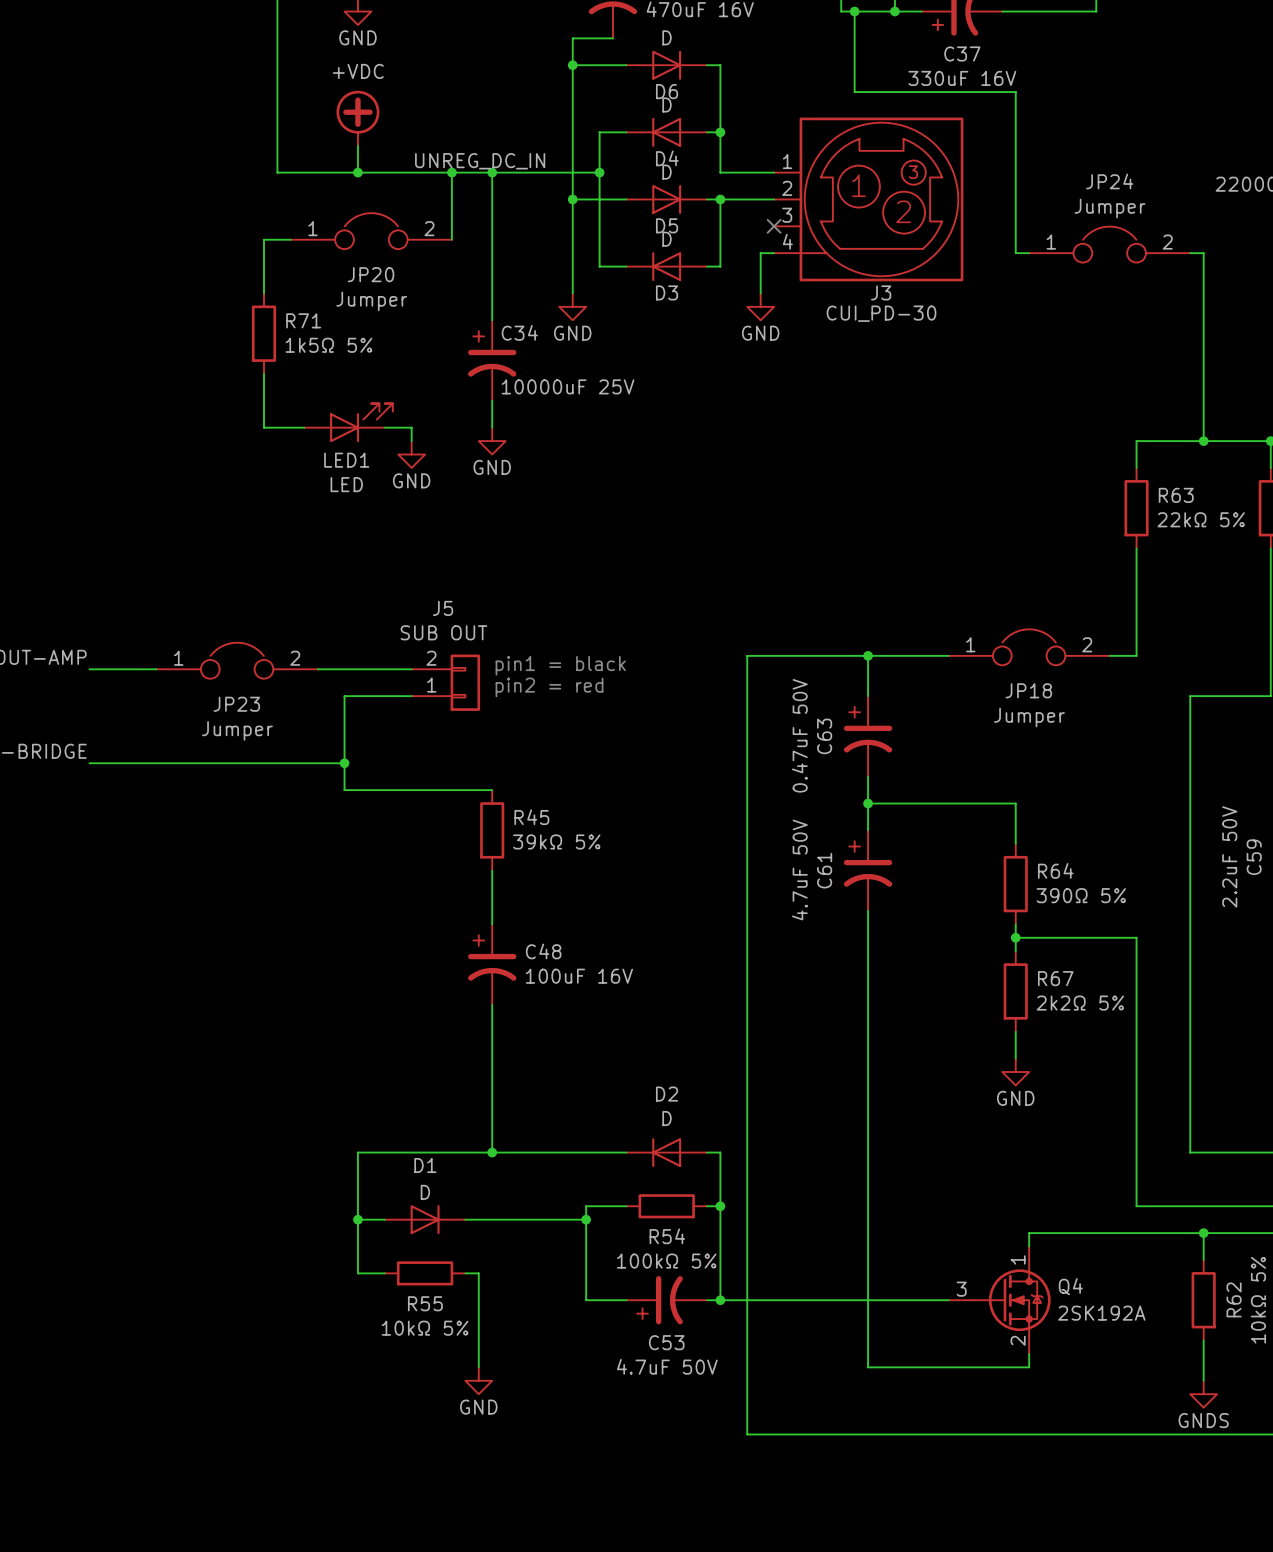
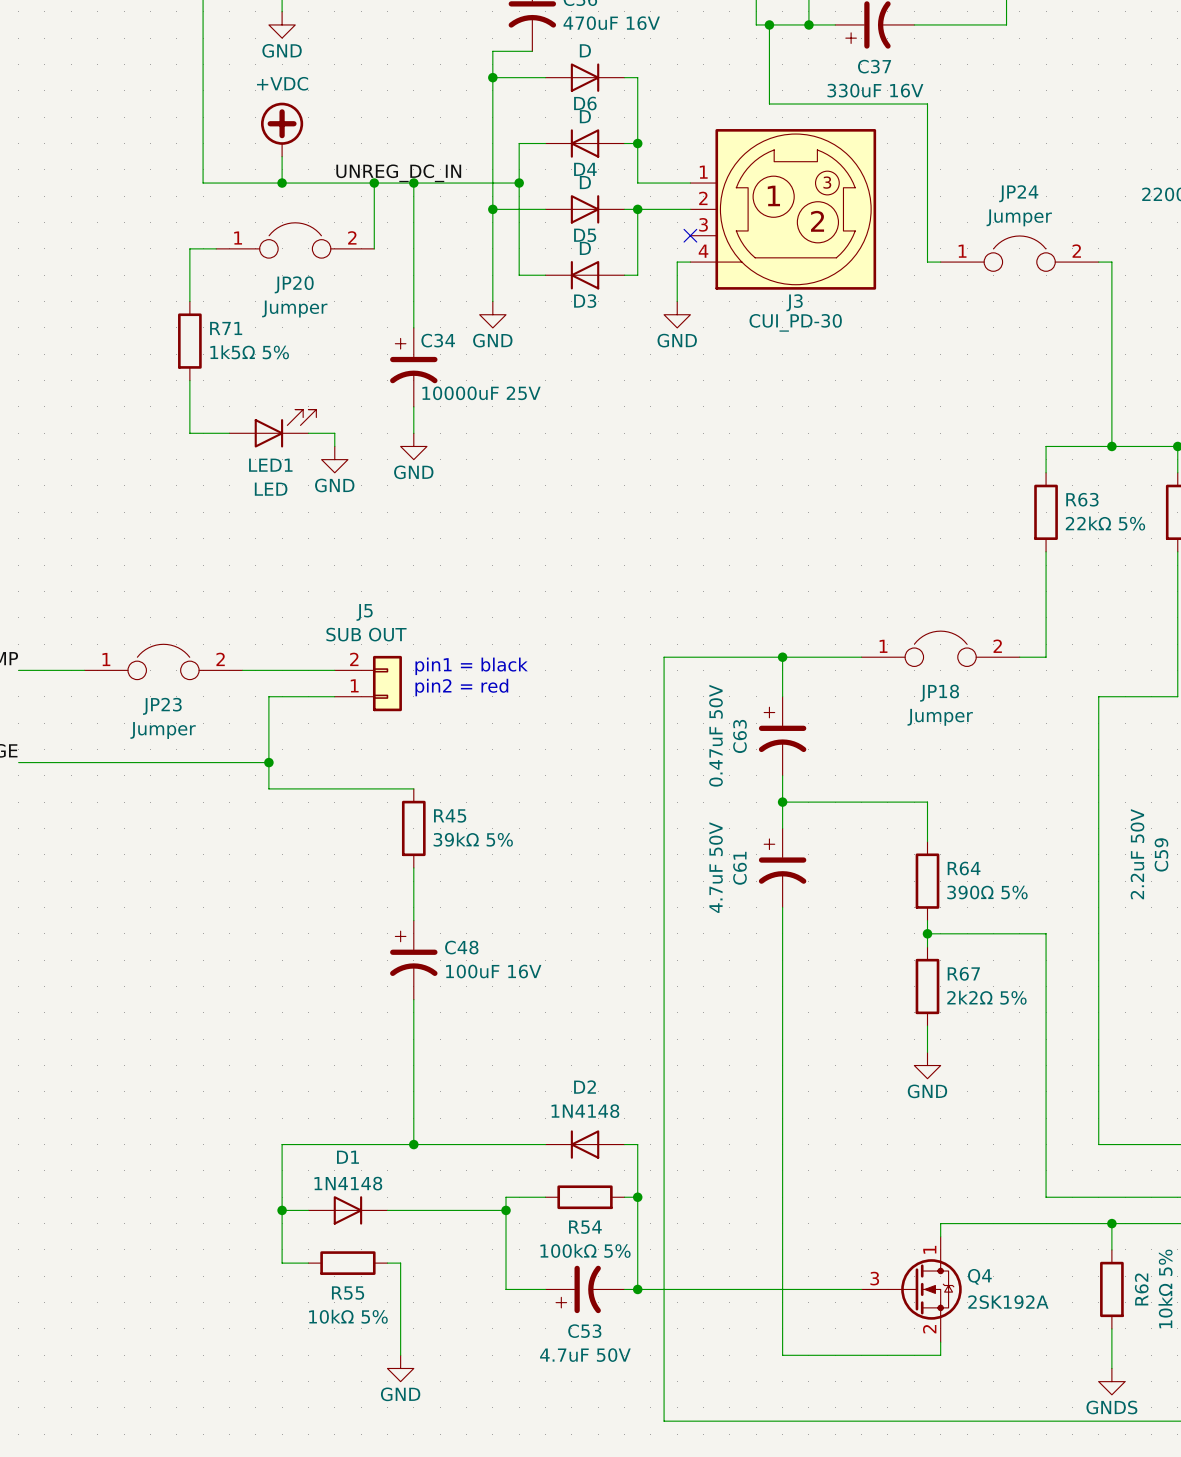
D2 value: D (667, 1118) -> 1N4148 (585, 1111)
D1 value: D (425, 1192) -> 1N4148 (348, 1183)

